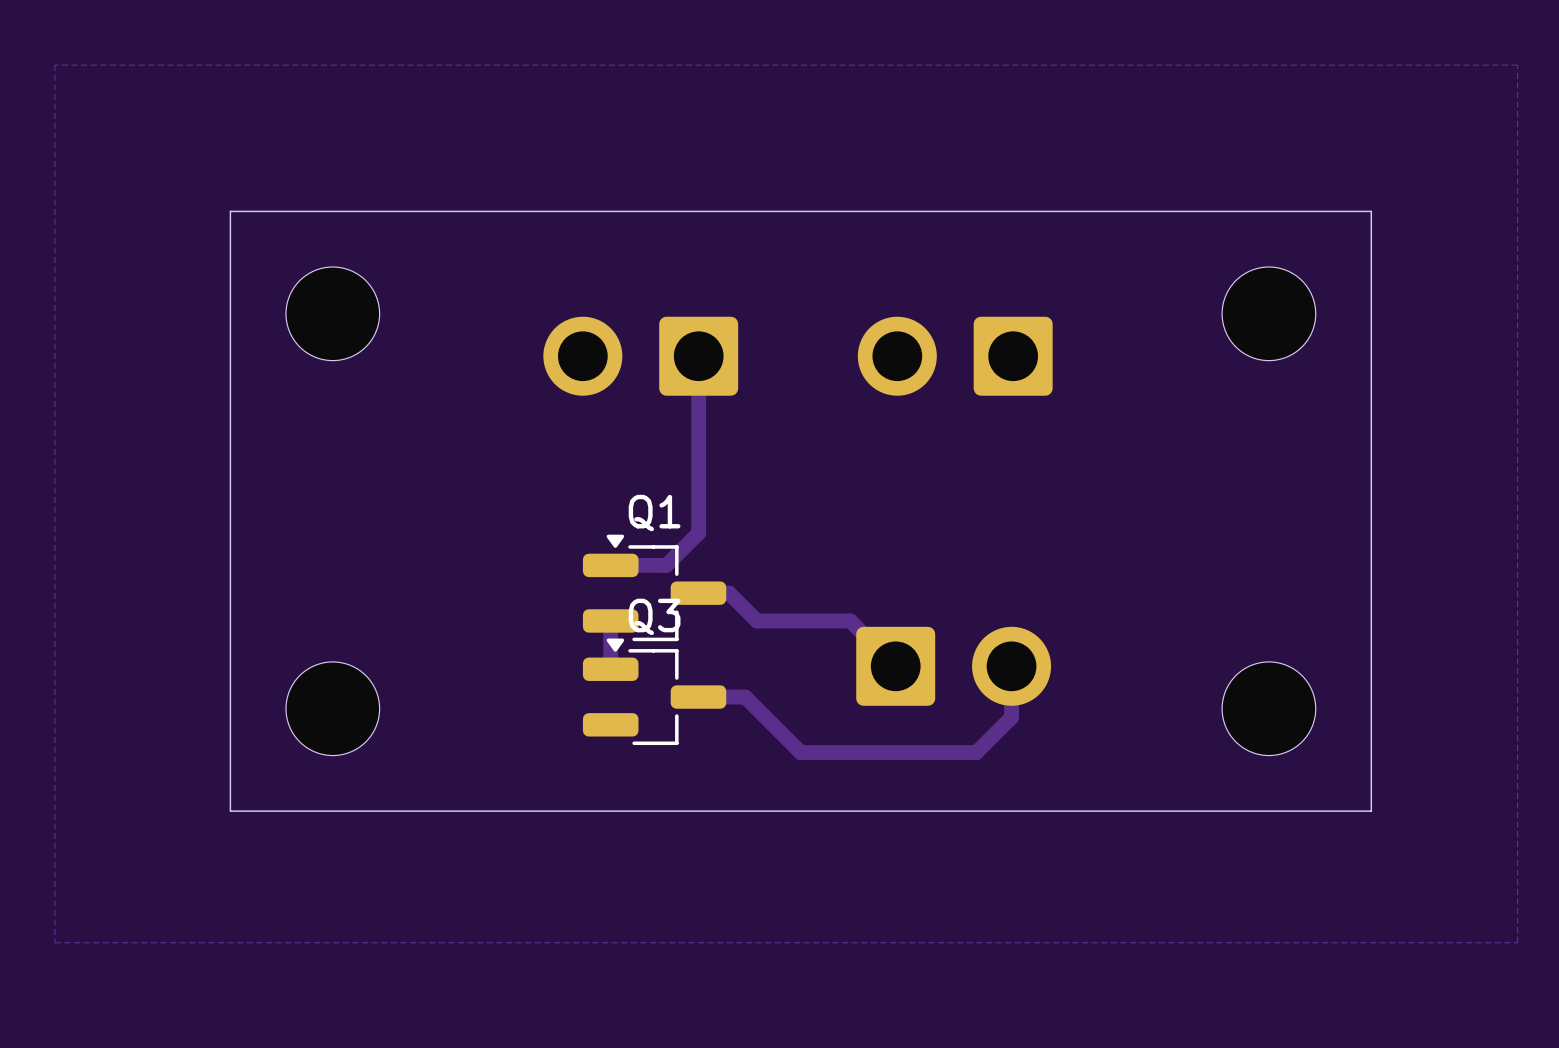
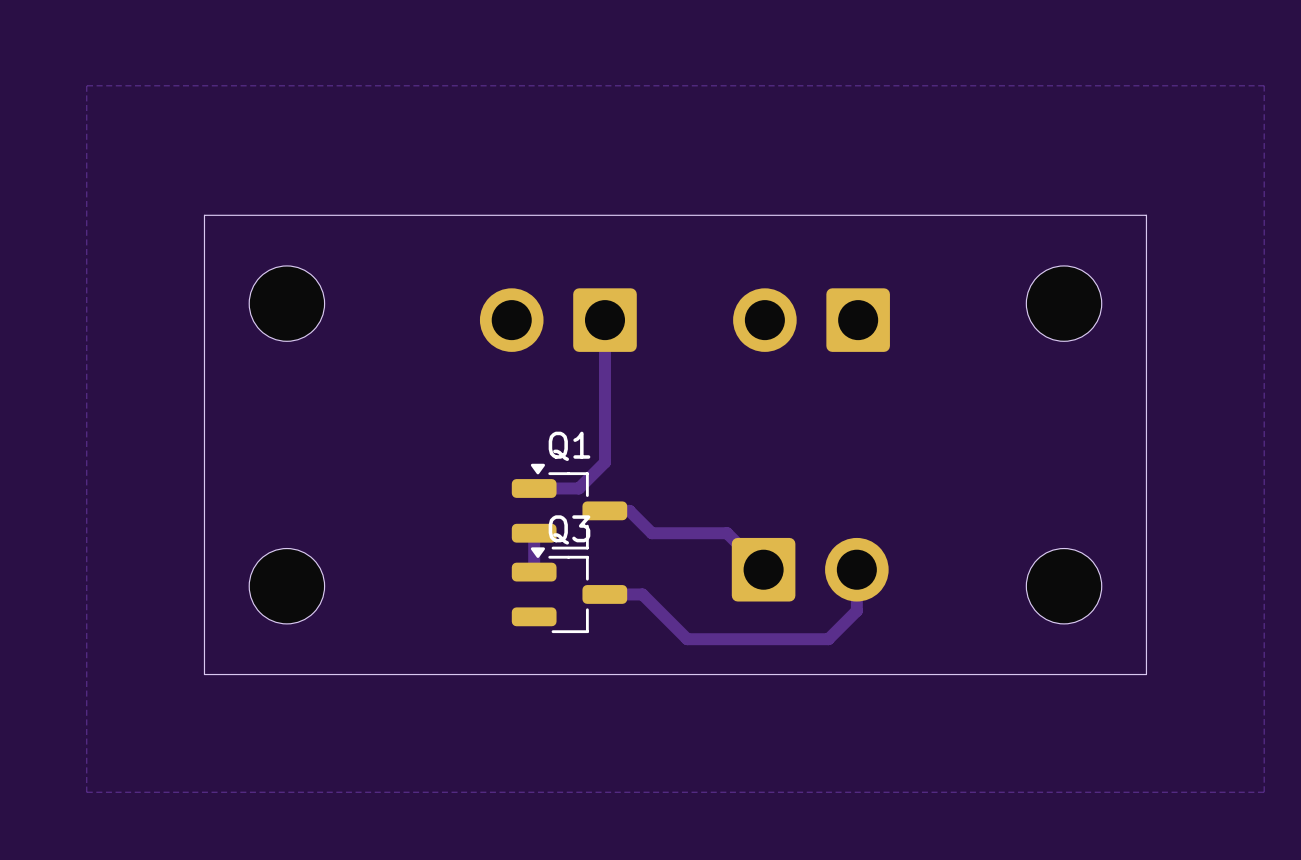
board edge: (1371, 226) (1371, 211) (230, 211) (230, 811) (1371, 811) (1371, 796) -> (1146, 215) (204, 215) (204, 674) (1146, 674)
part position: (332, 313) -> (286, 303)
part position: (1268, 313) -> (1064, 303)
part position: (332, 708) -> (286, 586)
part position: (1268, 708) -> (1064, 586)

